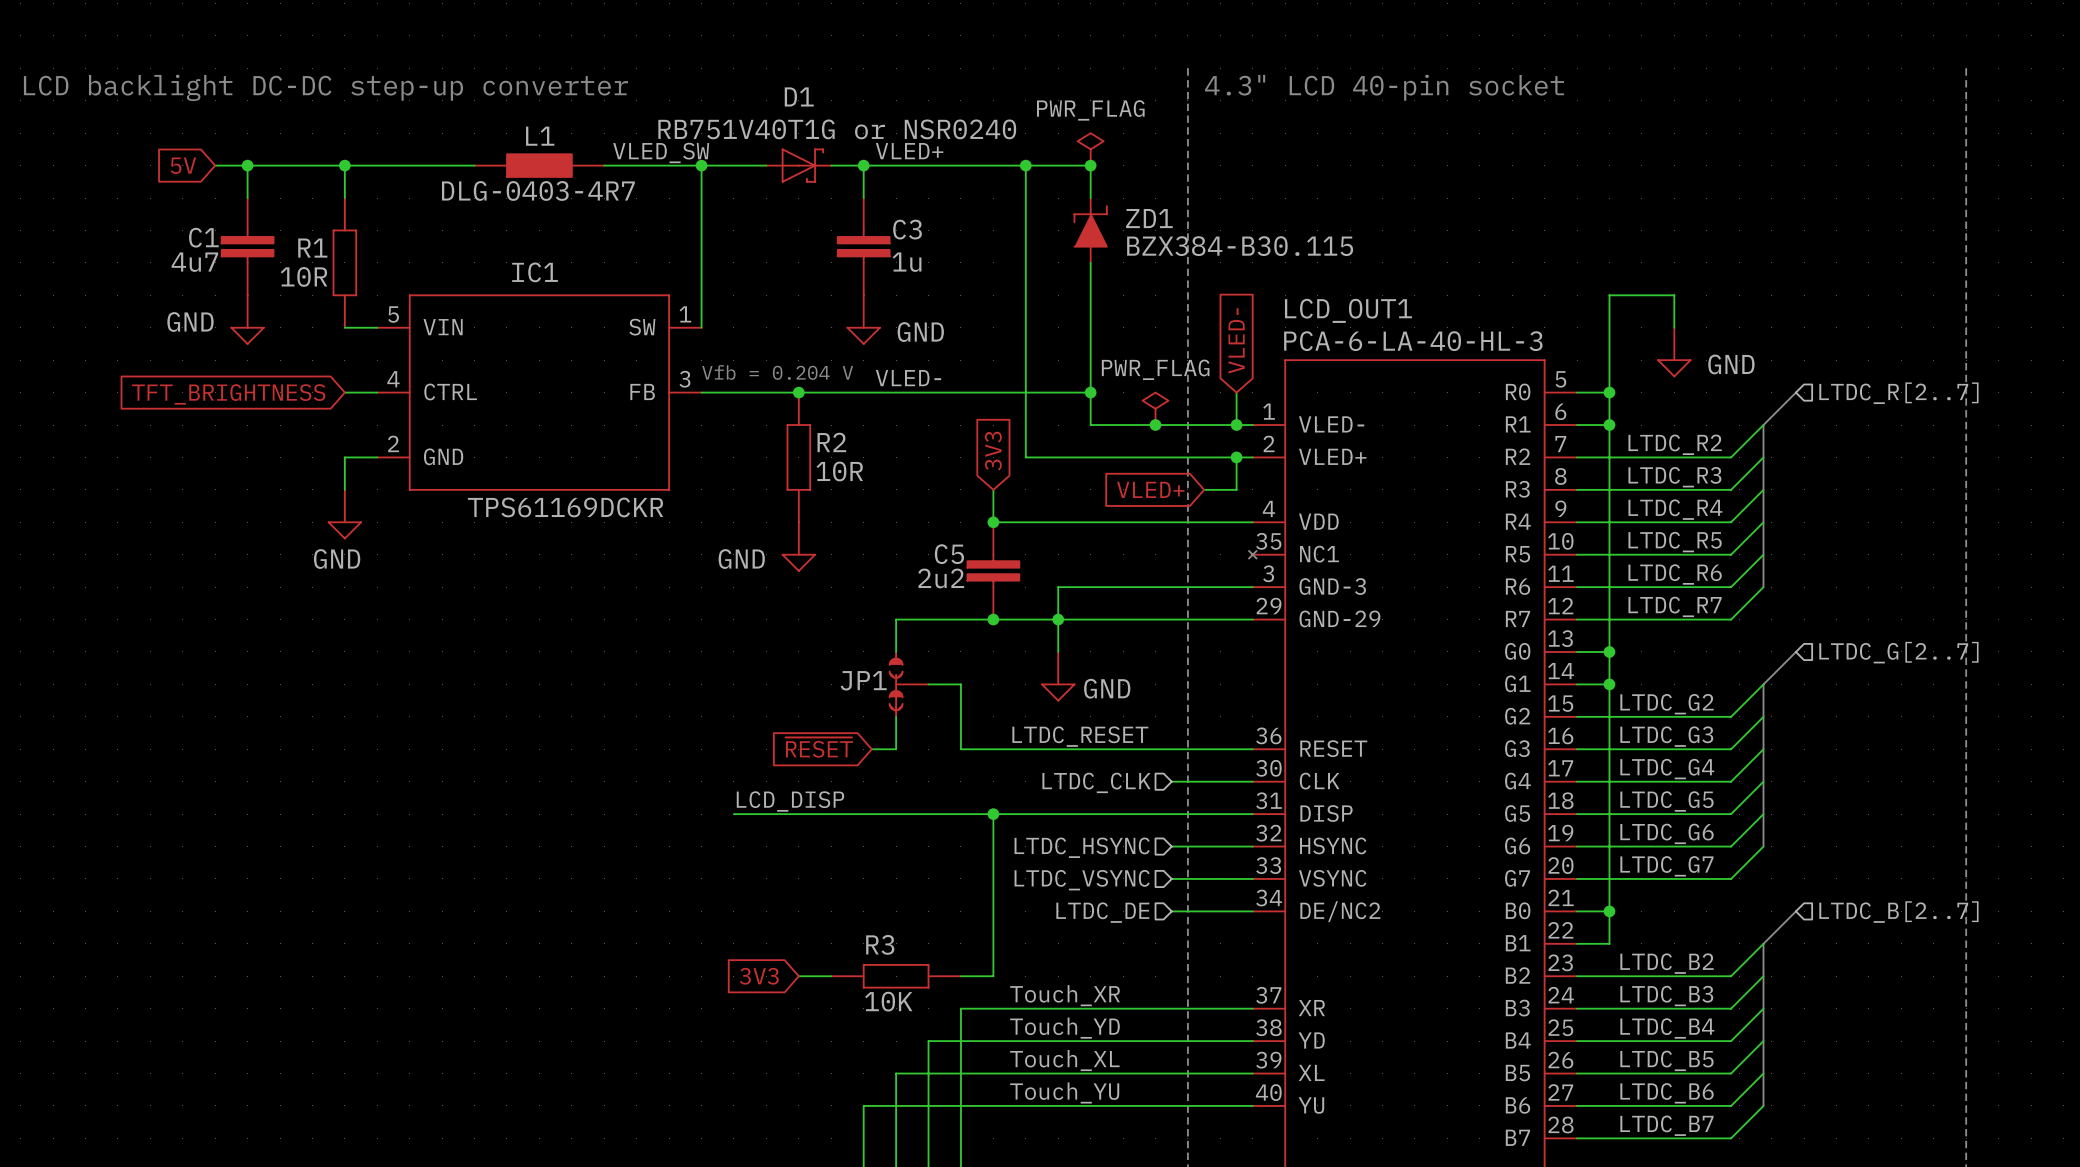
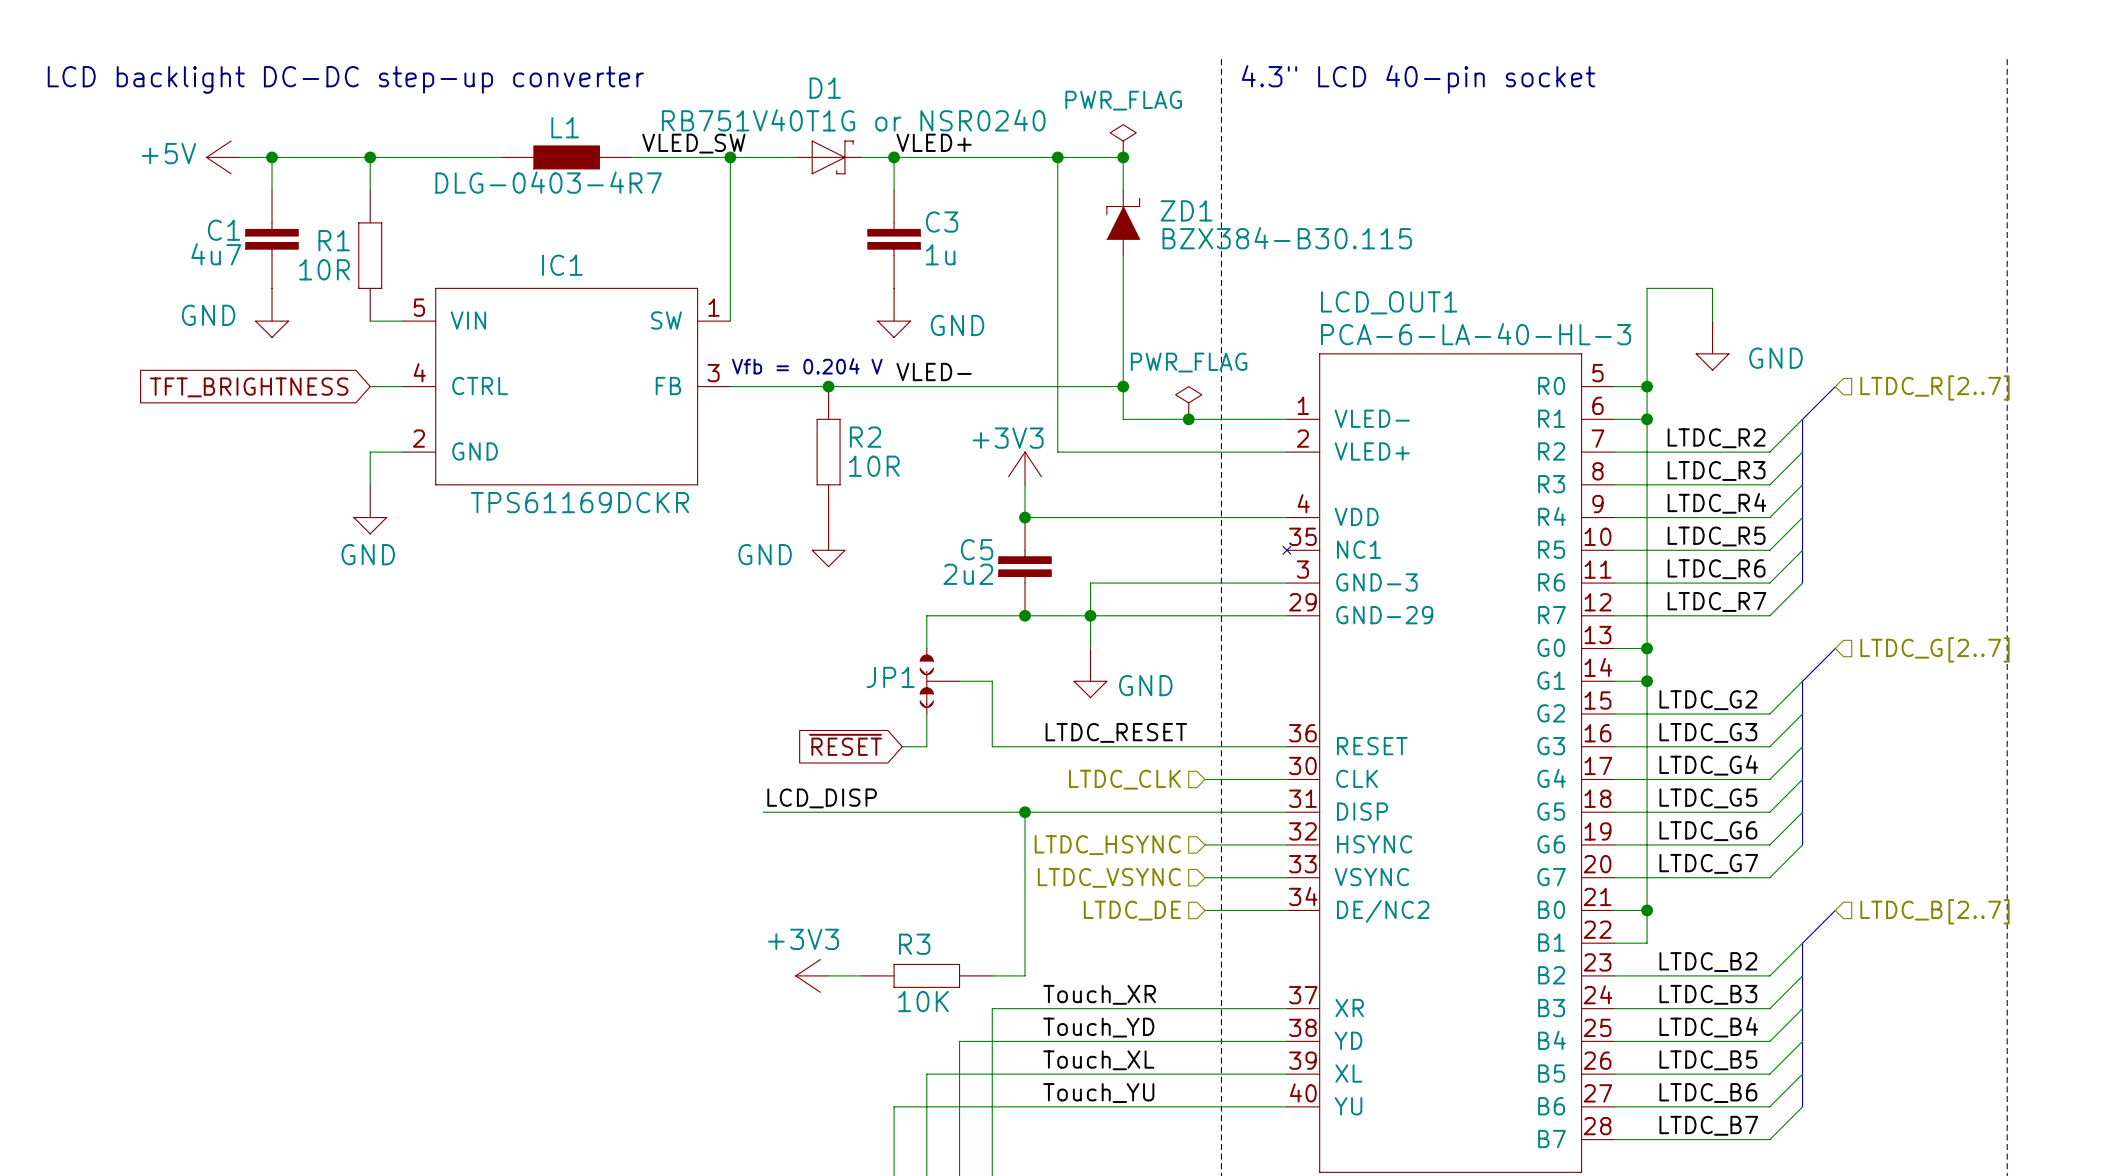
global label: 5V (183, 165) -> none
power symbol: none -> +5V (222, 157)
global label: VLED- (1236, 340) -> none
wire: (1236, 392) (1236, 425) -> none
junction: (1236, 425) -> none
global label: 3V3 (993, 451) -> none
wire: (1236, 457) (1236, 489) (1204, 489) -> none
junction: (1236, 457) -> none
power symbol: none -> +3V3 (1025, 468)
global label: VLED+ (1150, 489) -> none
global label: 3V3 (759, 976) -> none
power symbol: none -> +3V3 (812, 975)

